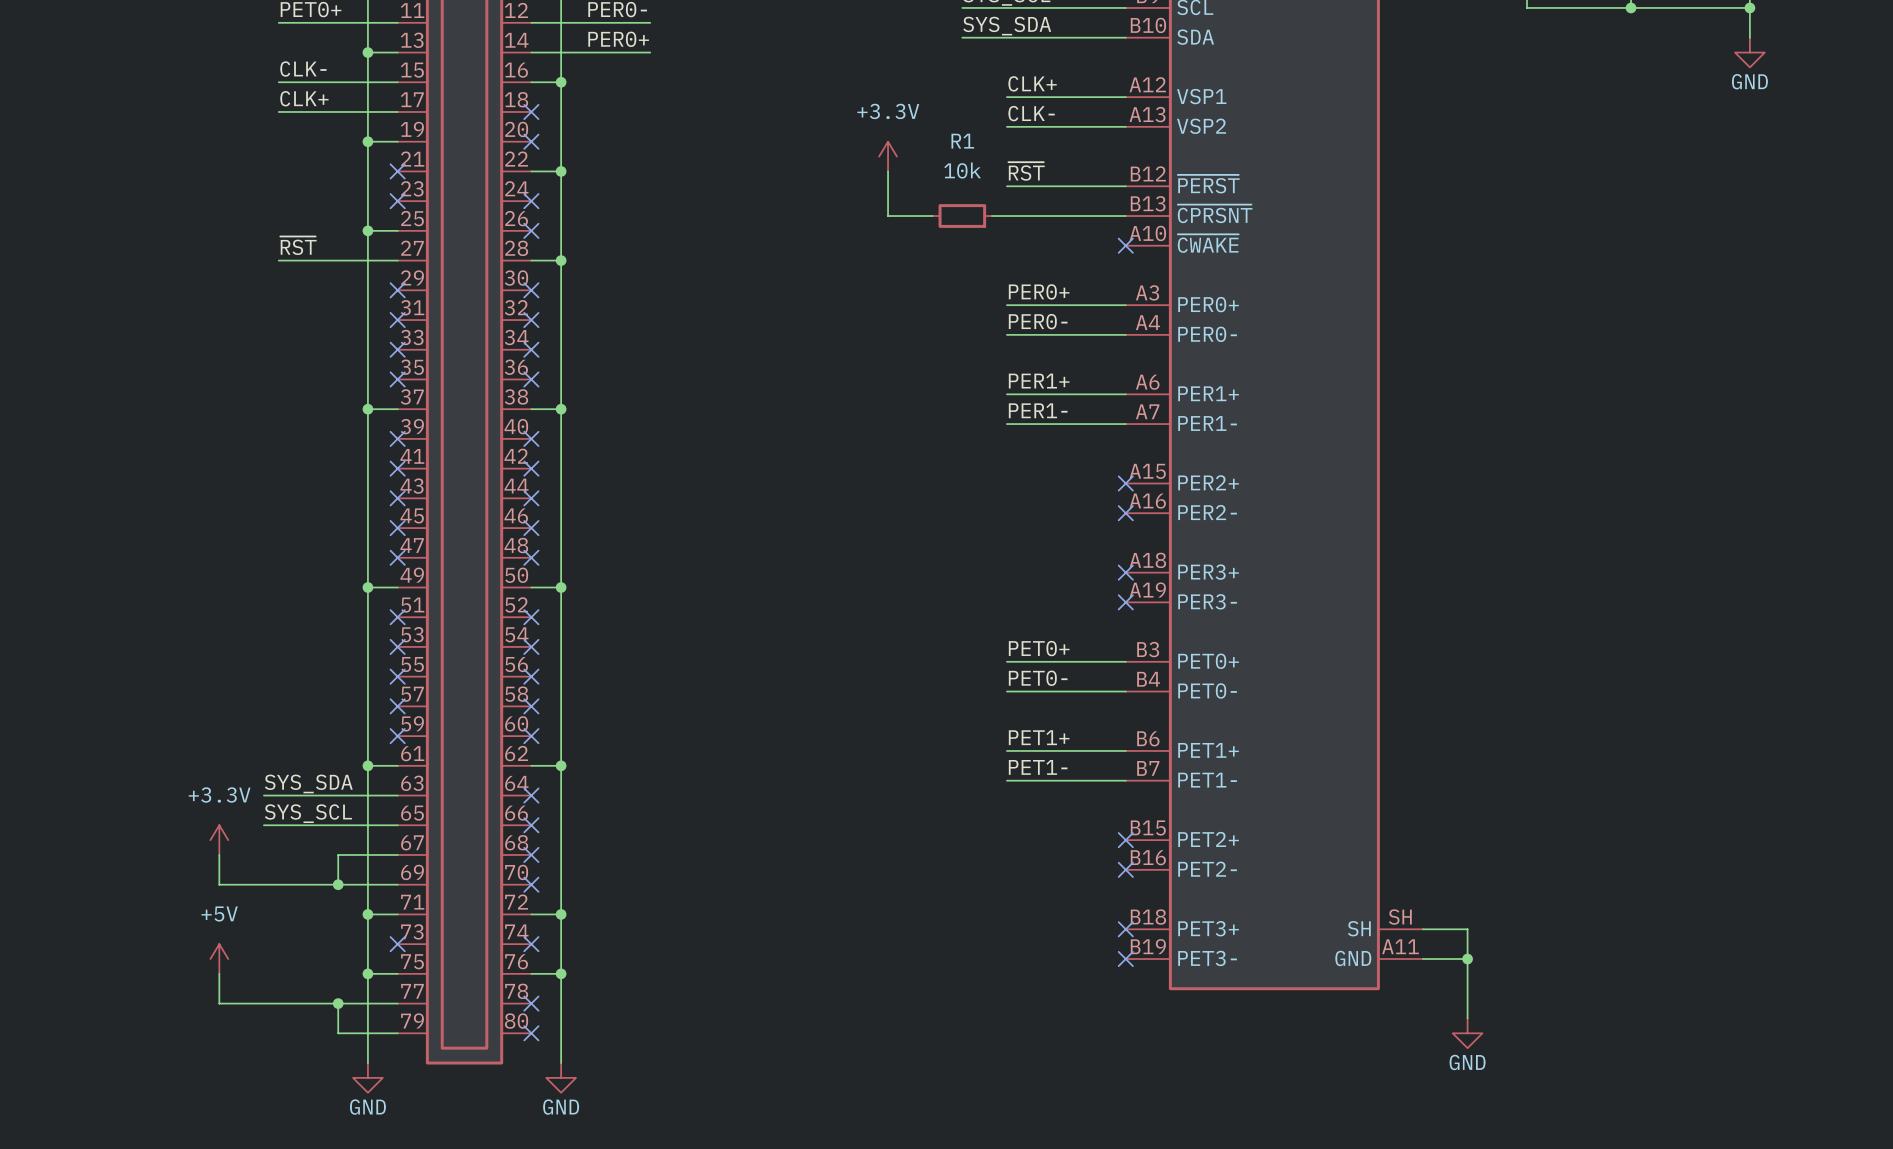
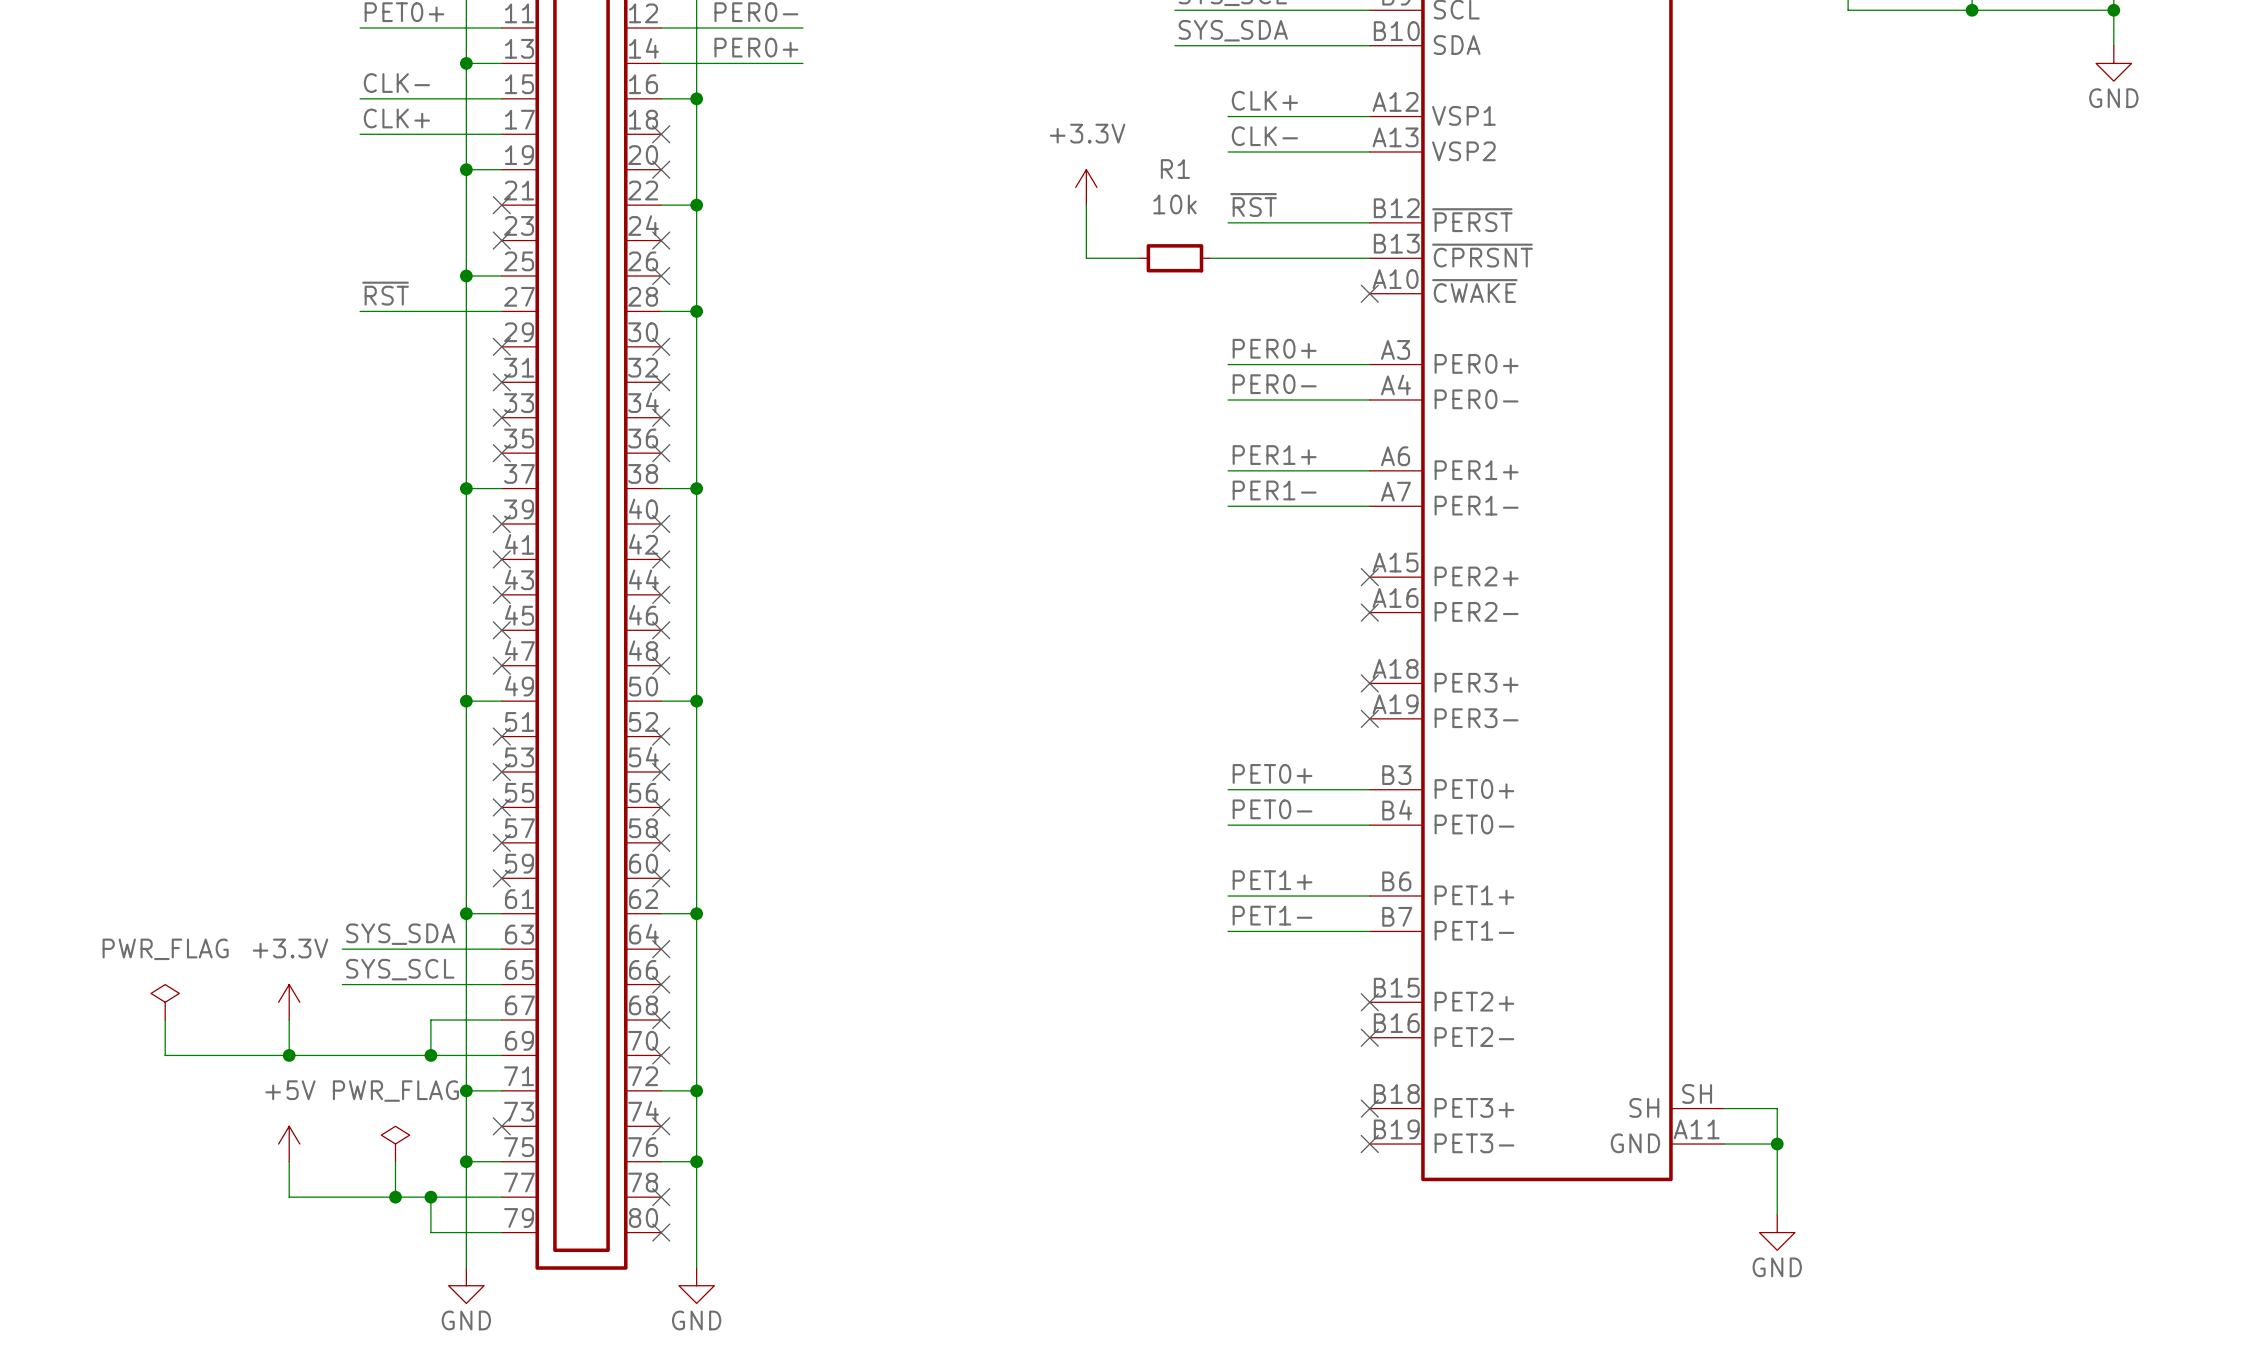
power symbol: none -> PWR_FLAG (165, 1002)
wire: none -> (165, 1020) (165, 1055) (289, 1055)
junction: none -> (289, 1055)
power symbol: none -> PWR_FLAG (395, 1144)
wire: none -> (395, 1161) (395, 1197)
junction: none -> (395, 1197)

